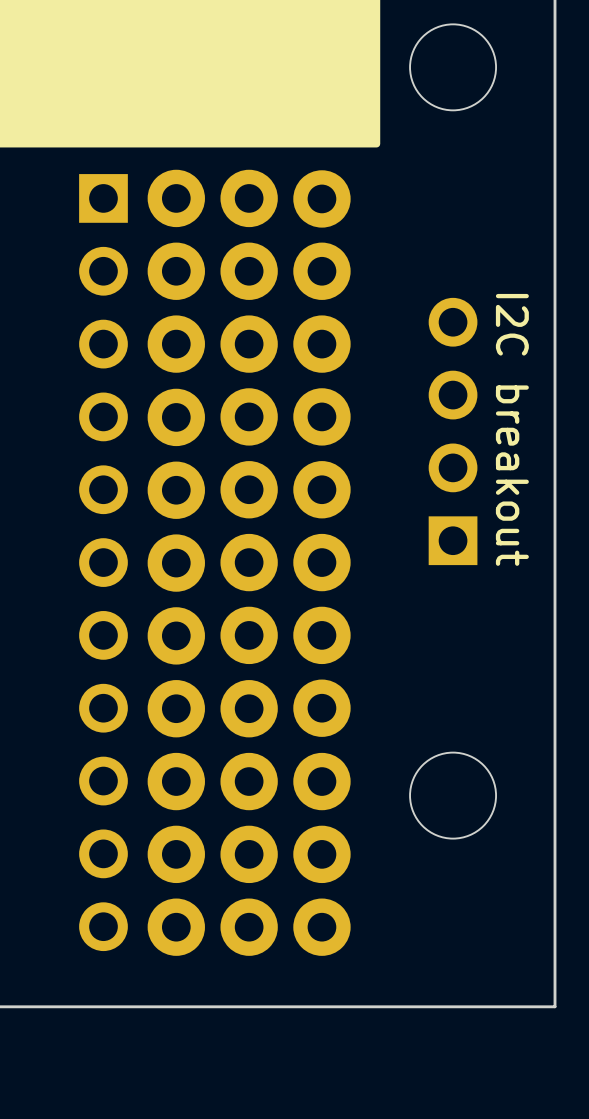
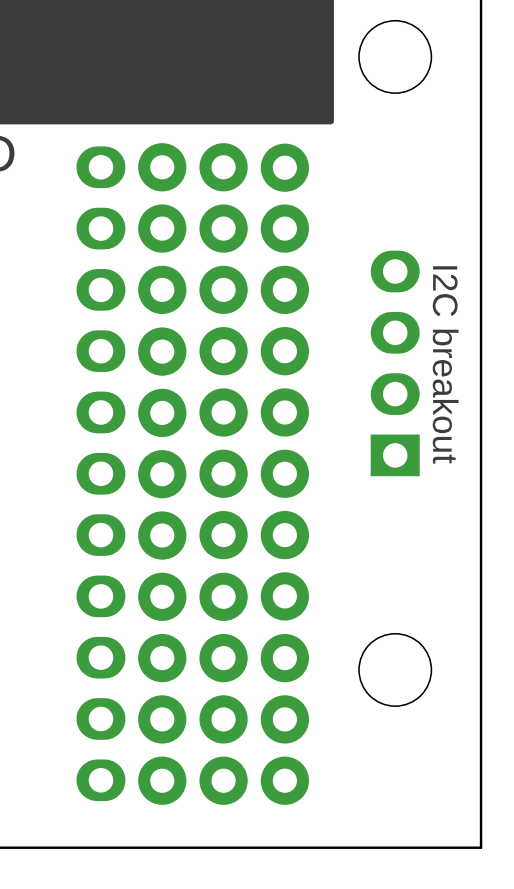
part footprint: [79, 174, 128, 952] -> [76, 146, 126, 802]
part footprint: [428, 297, 478, 566] -> [370, 250, 420, 477]
text: I2C breakout (512, 429) -> none

